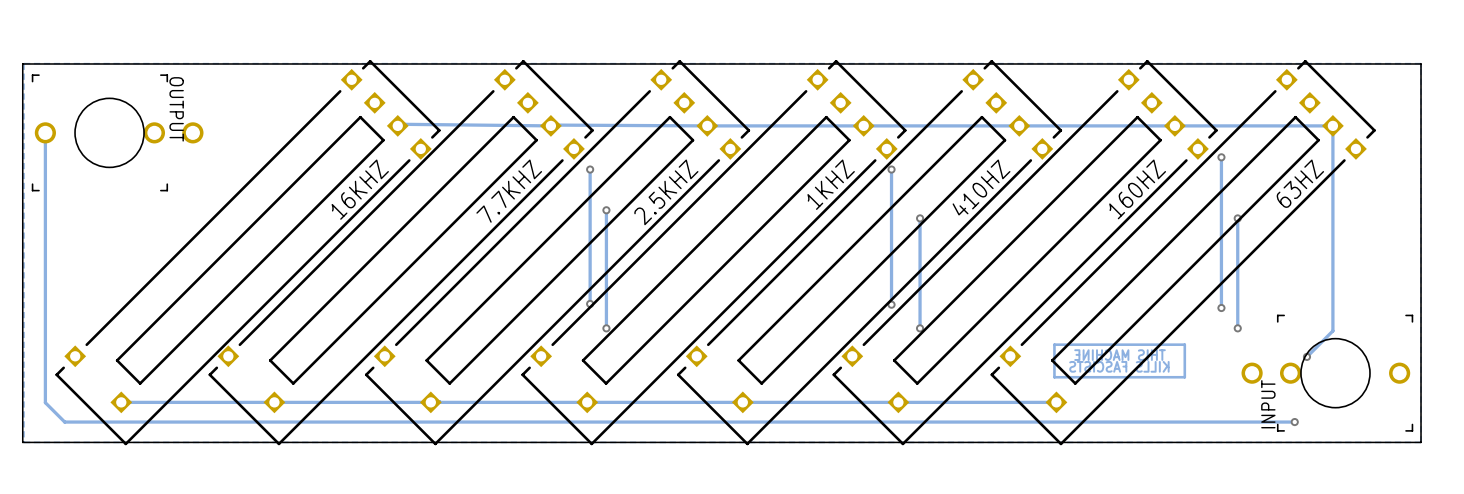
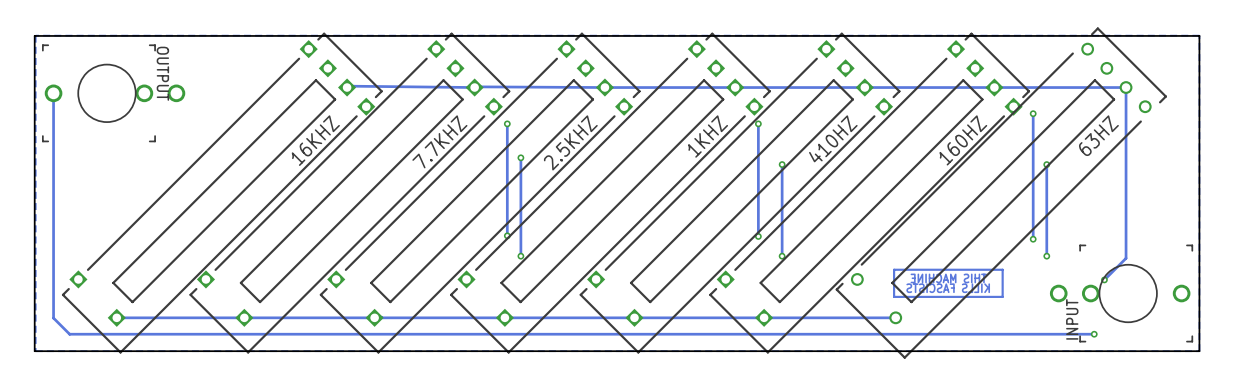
63HZ footprint: [990, 60, 1376, 446] -> [835, 27, 1167, 359]

